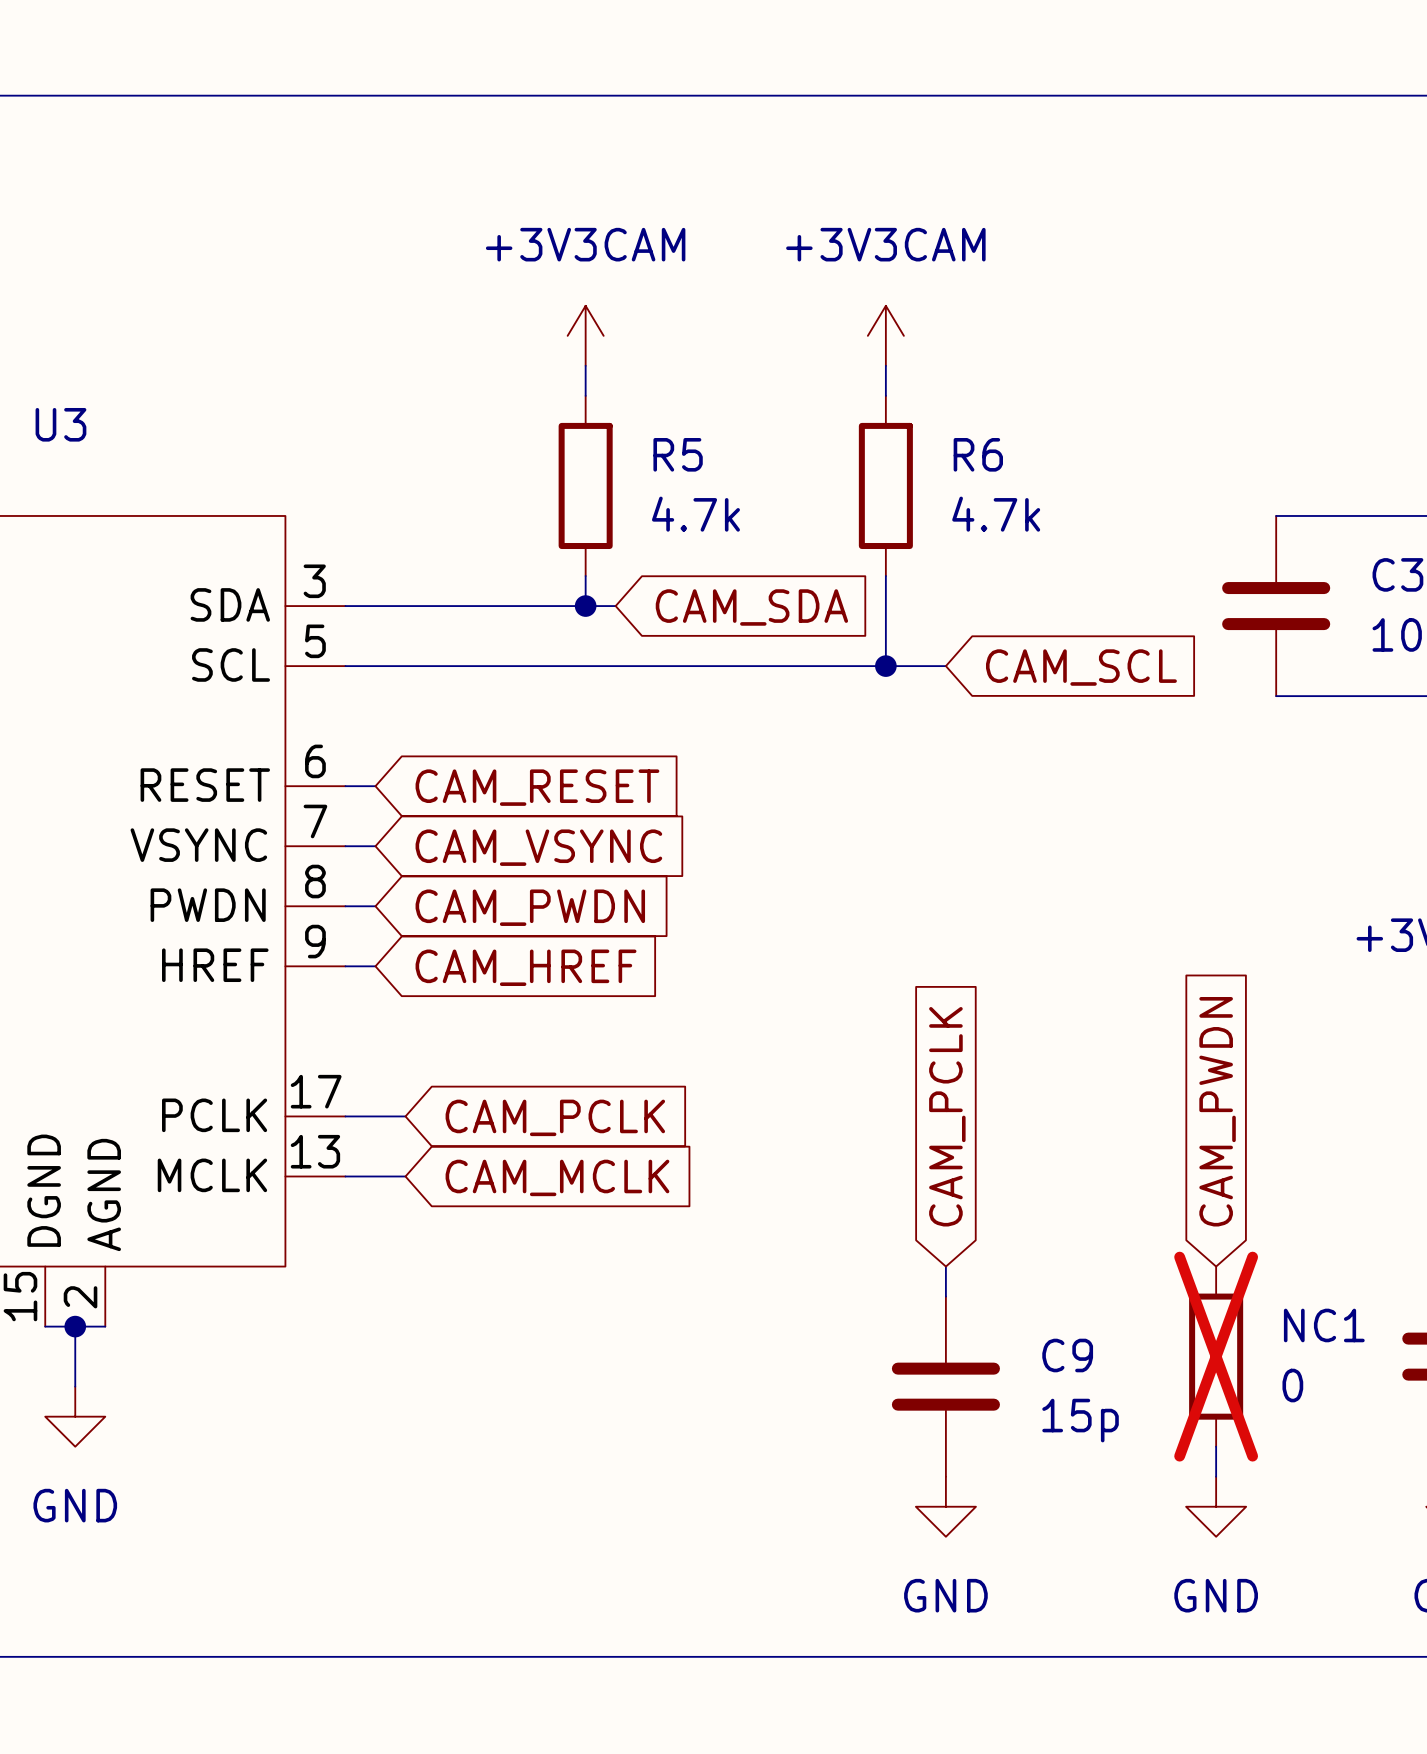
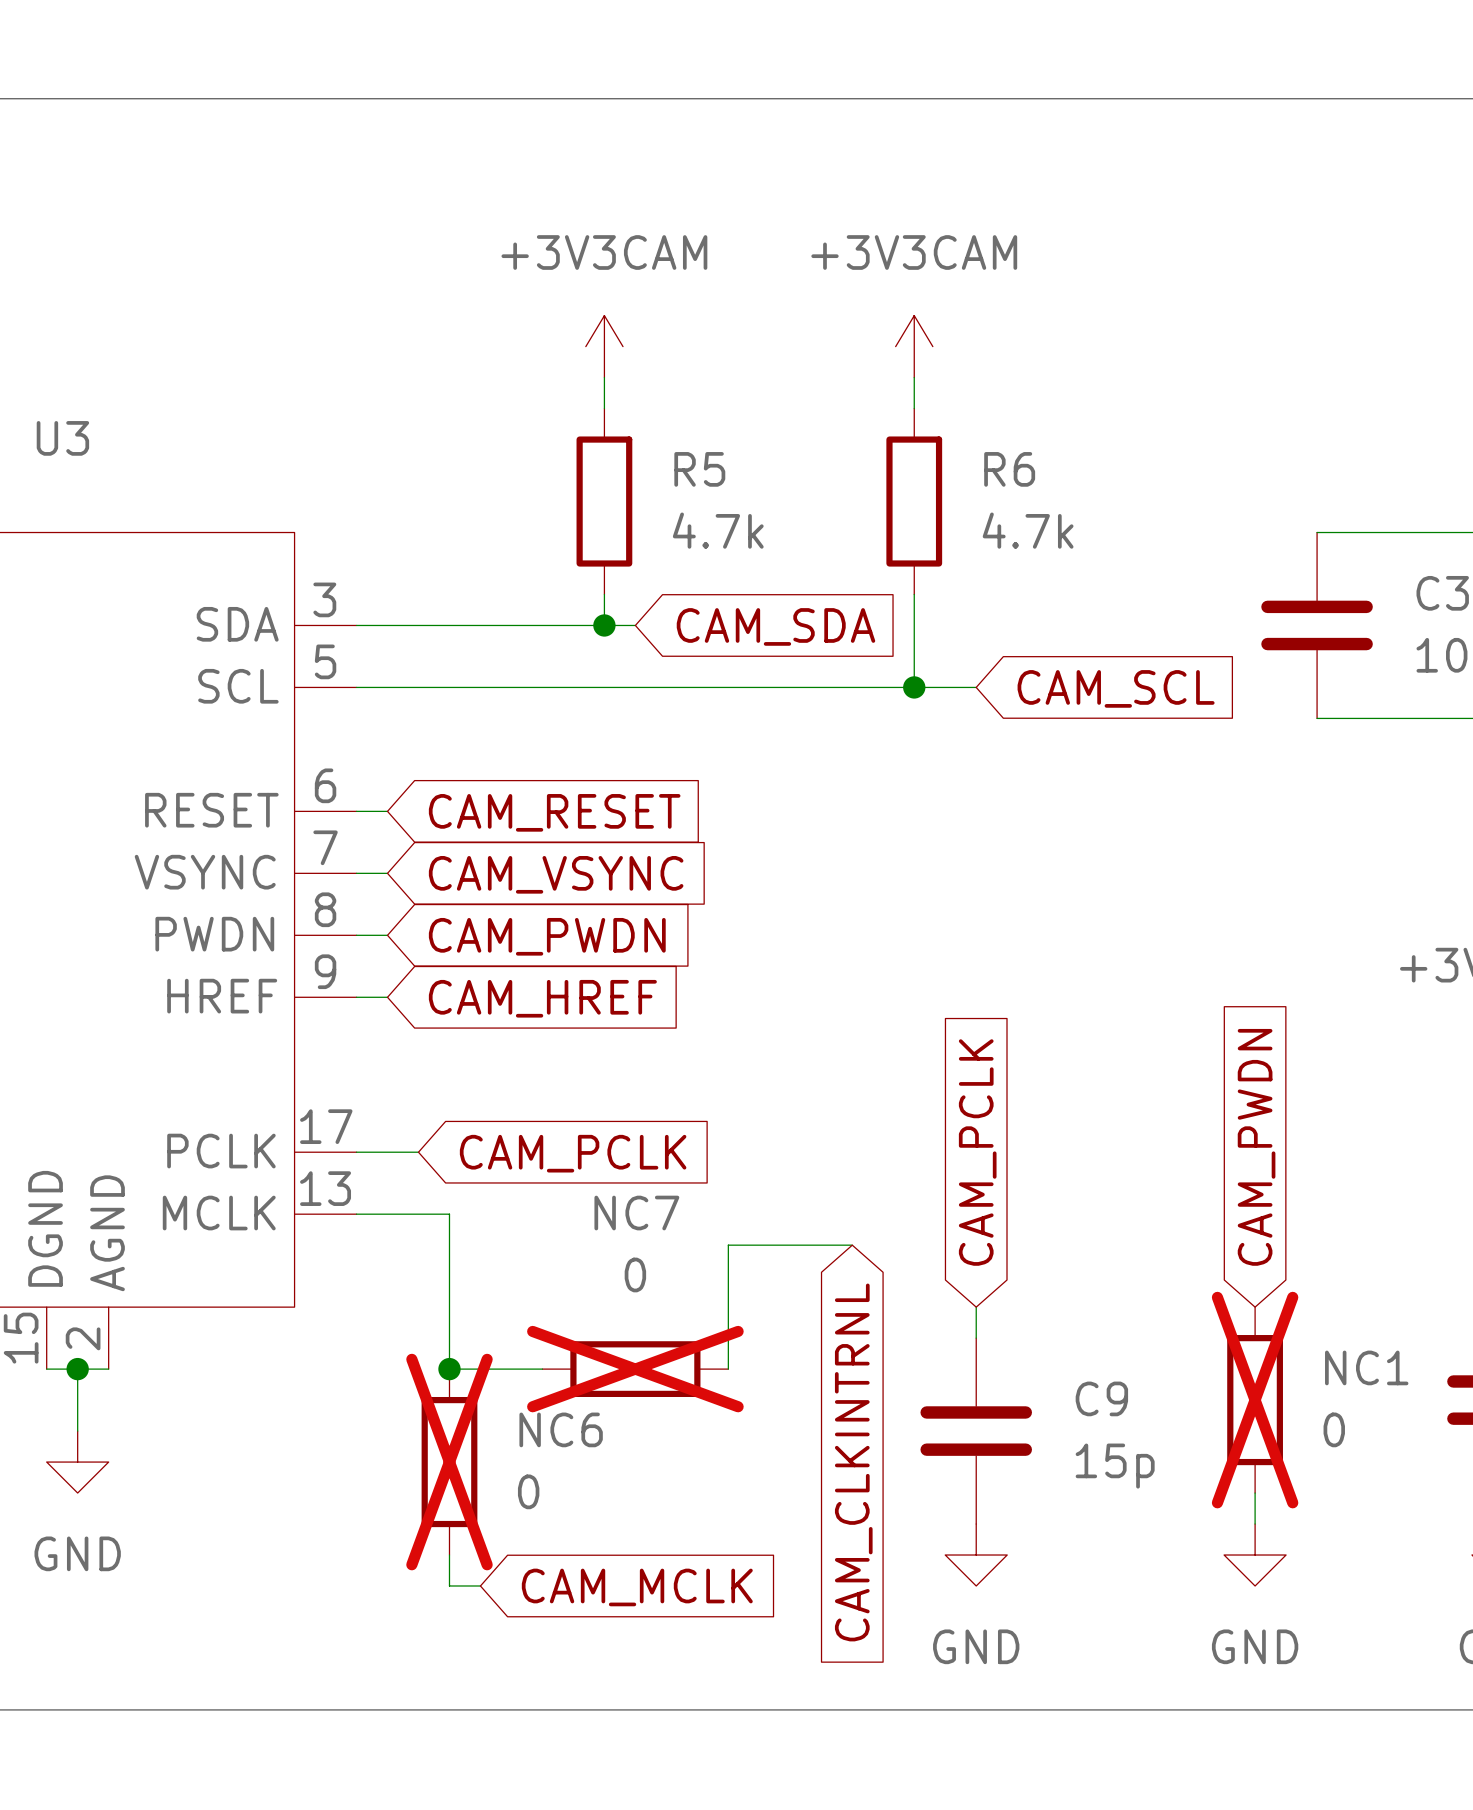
wire: none -> (418, 1214) (449, 1214) (449, 1369) (542, 1369)
global label position: CAM_MCLK (557, 1177) -> CAM_MCLK (637, 1587)
wire: none -> (852, 1245) (728, 1245) (728, 1369)
junction: none -> (449, 1369)
NC7: none -> 0 (635, 1369)
NC6: none -> 0 (449, 1462)
global label: none -> CAM_CLKINTRNL (853, 1462)
wire: none -> (449, 1555) (449, 1585) (480, 1585)

